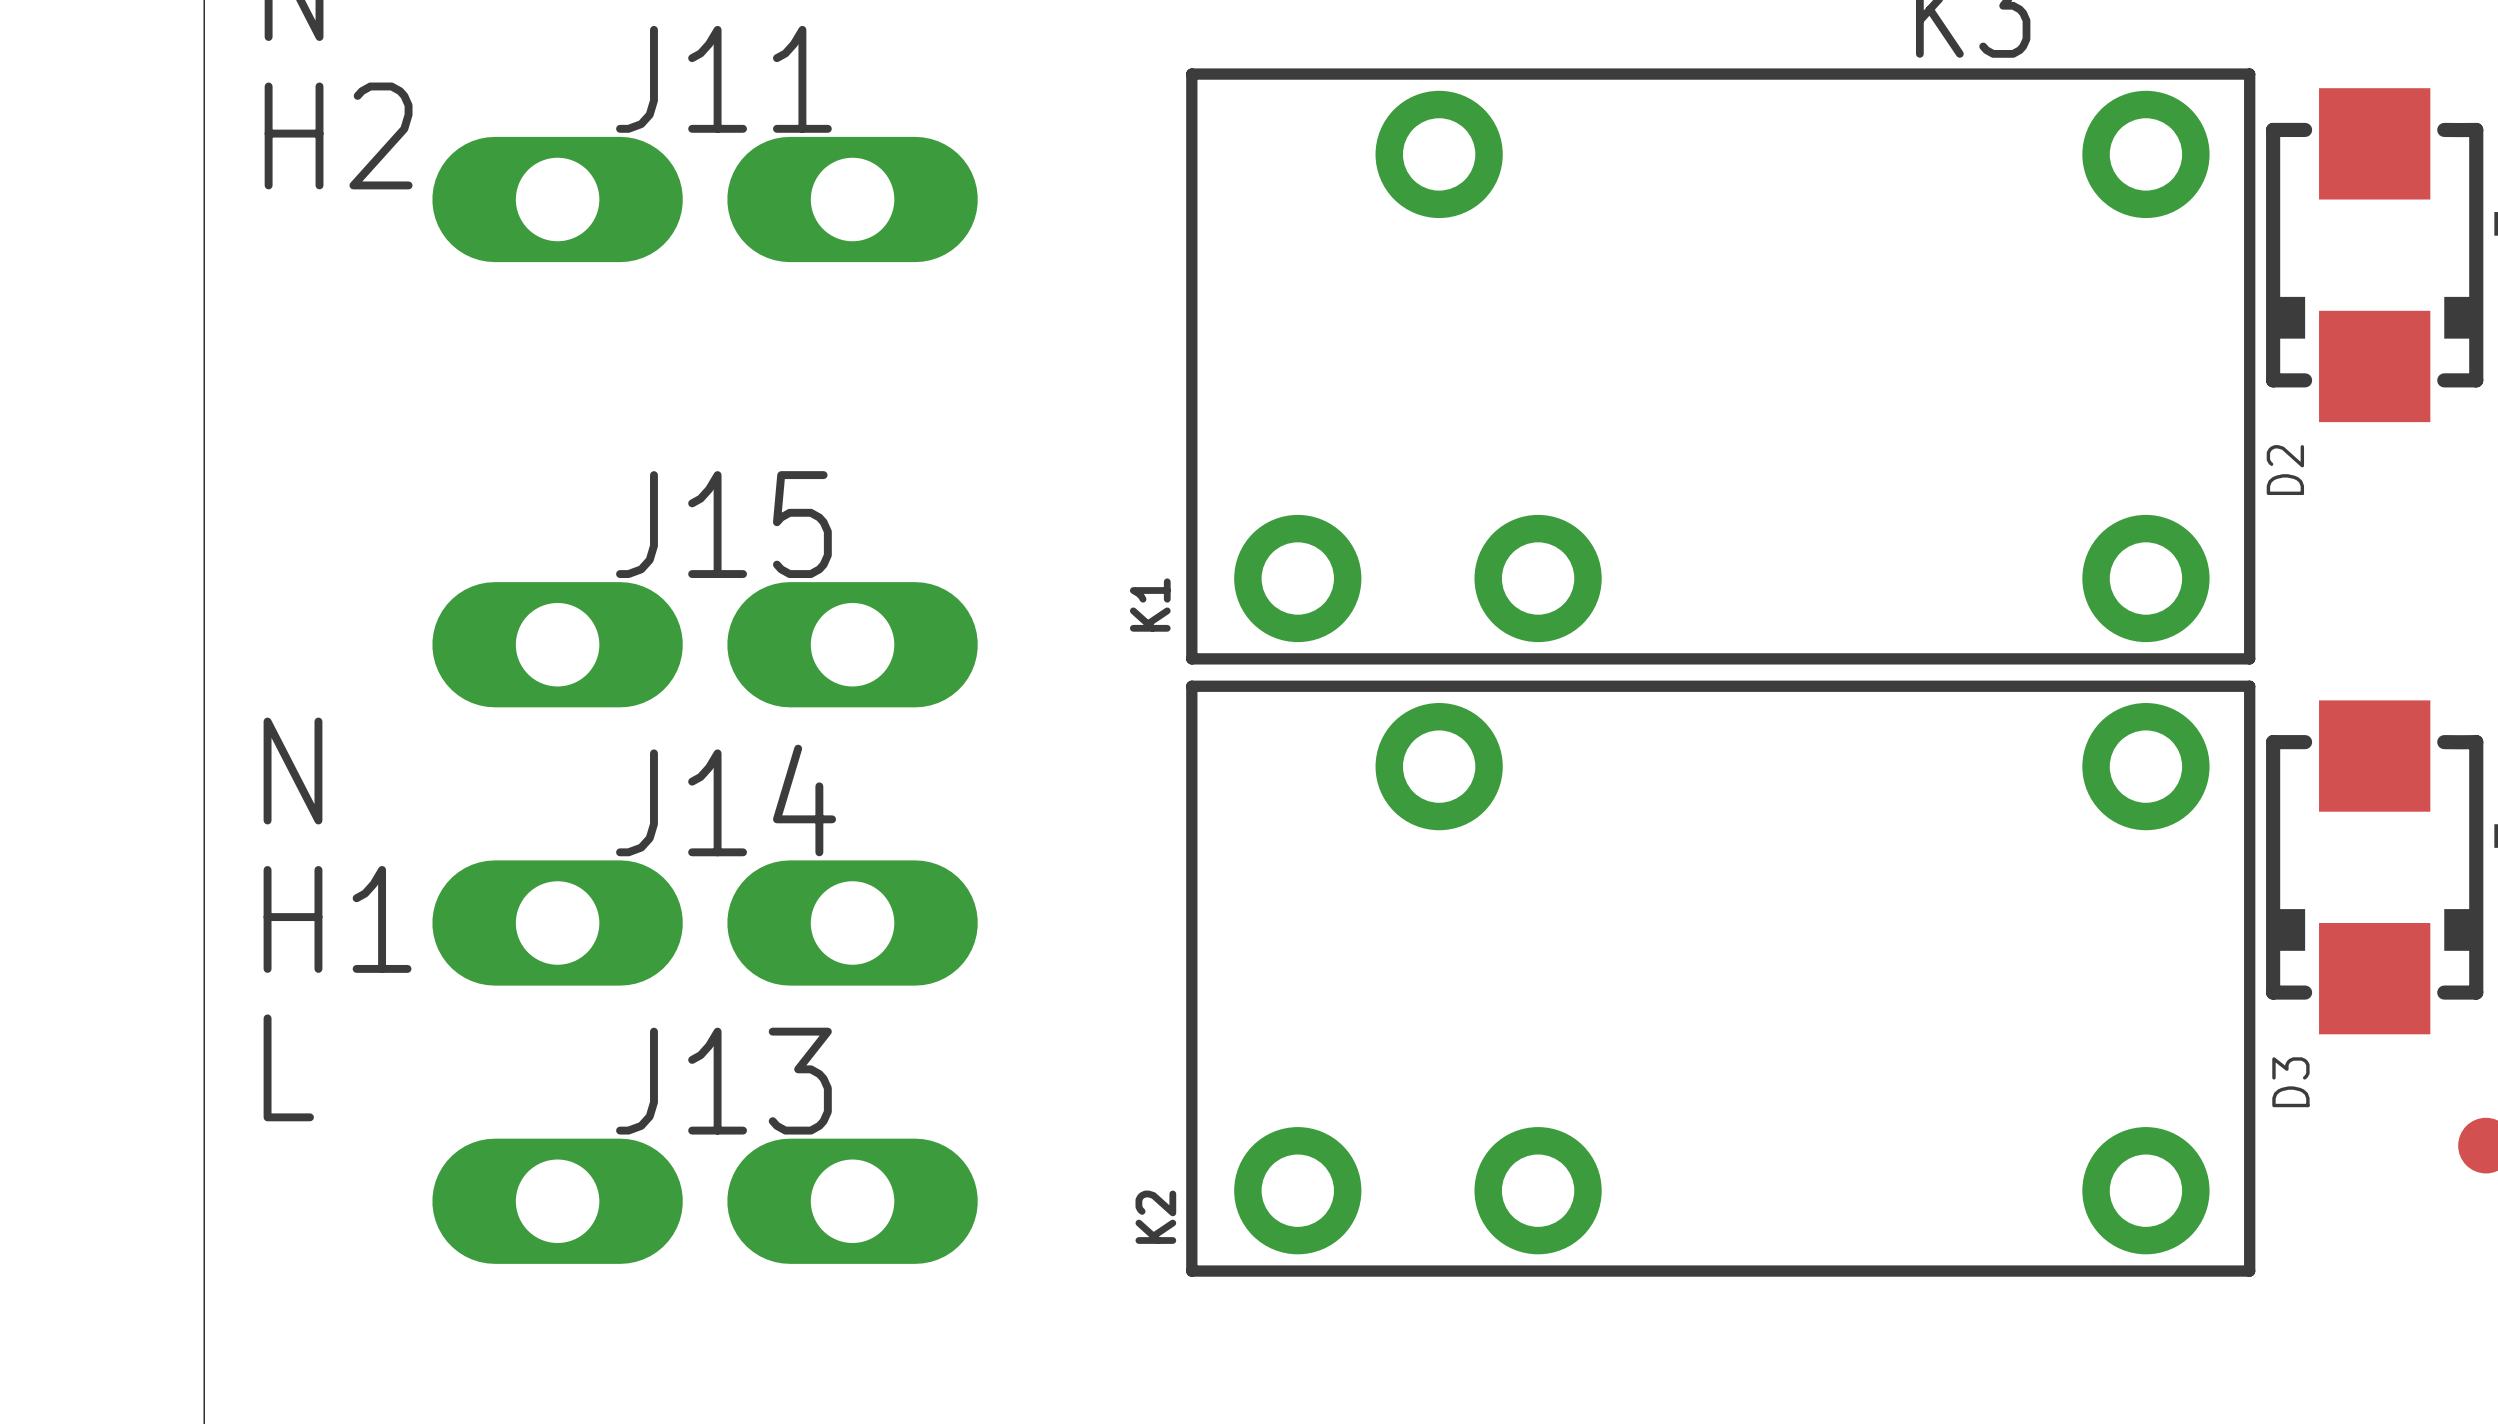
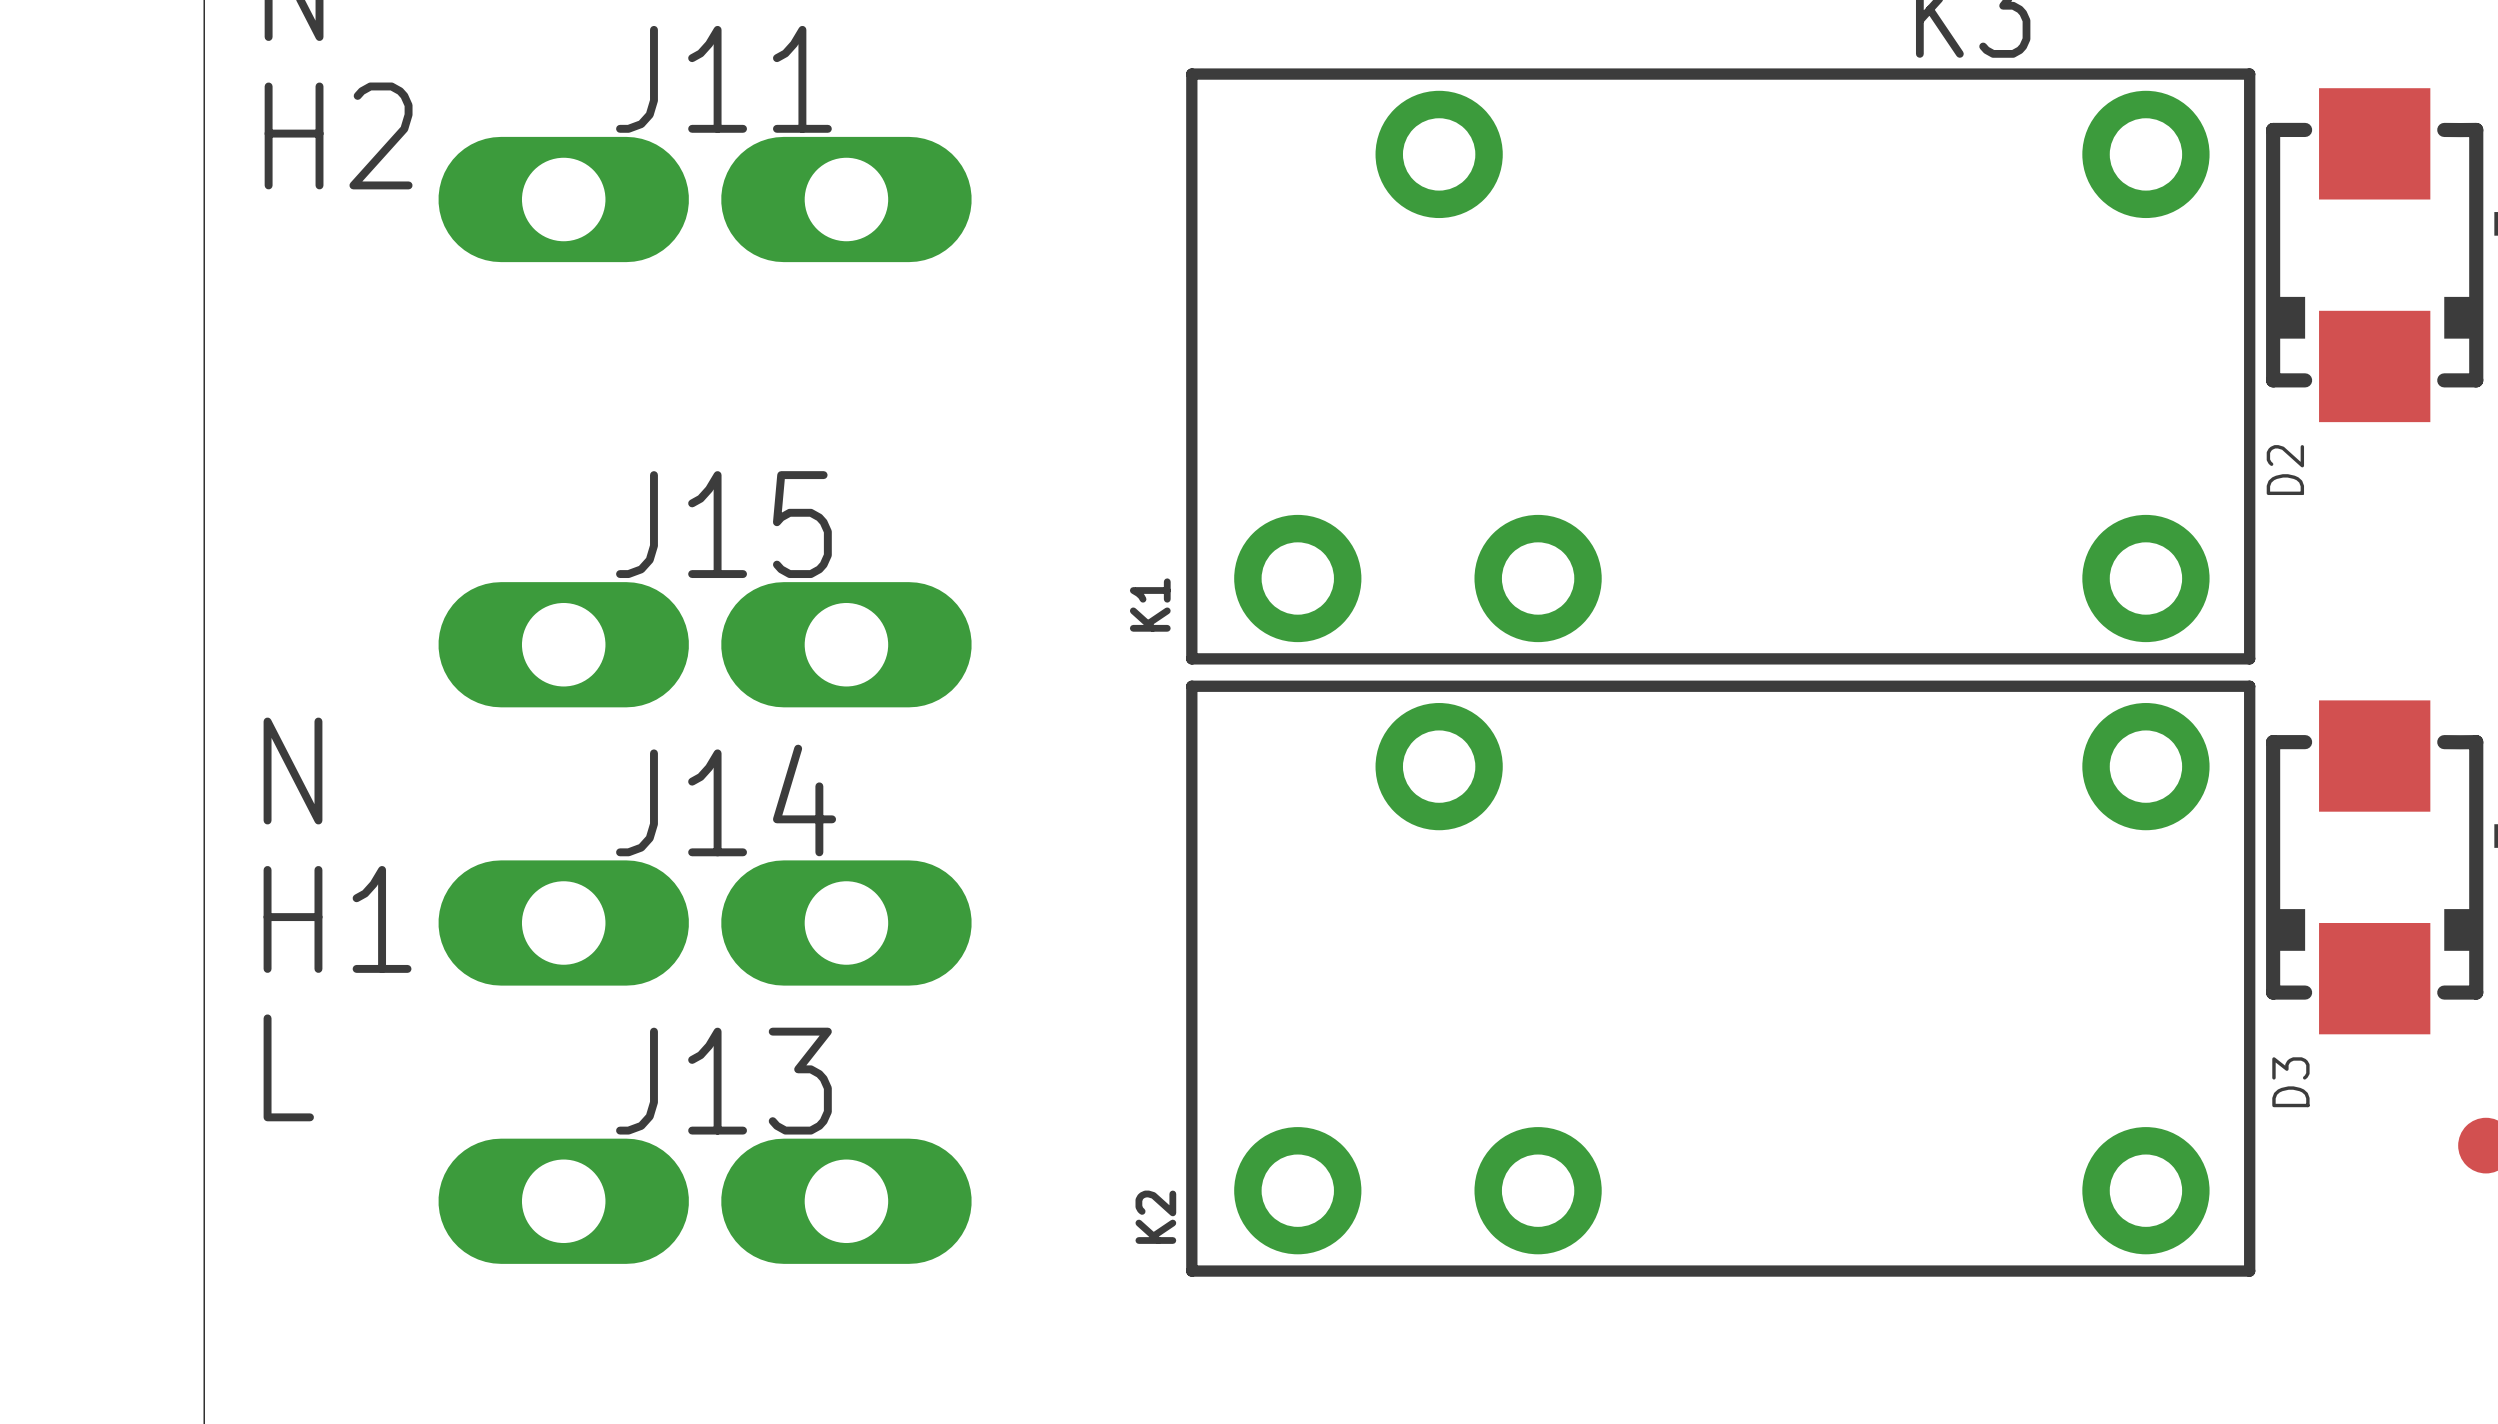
J11 footprint: [432, 136, 978, 263] -> [438, 136, 972, 263]
J15 footprint: [432, 582, 978, 708] -> [438, 582, 972, 708]
J14 footprint: [432, 860, 978, 986] -> [438, 860, 972, 986]
J13 footprint: [432, 1138, 978, 1264] -> [438, 1138, 972, 1264]

